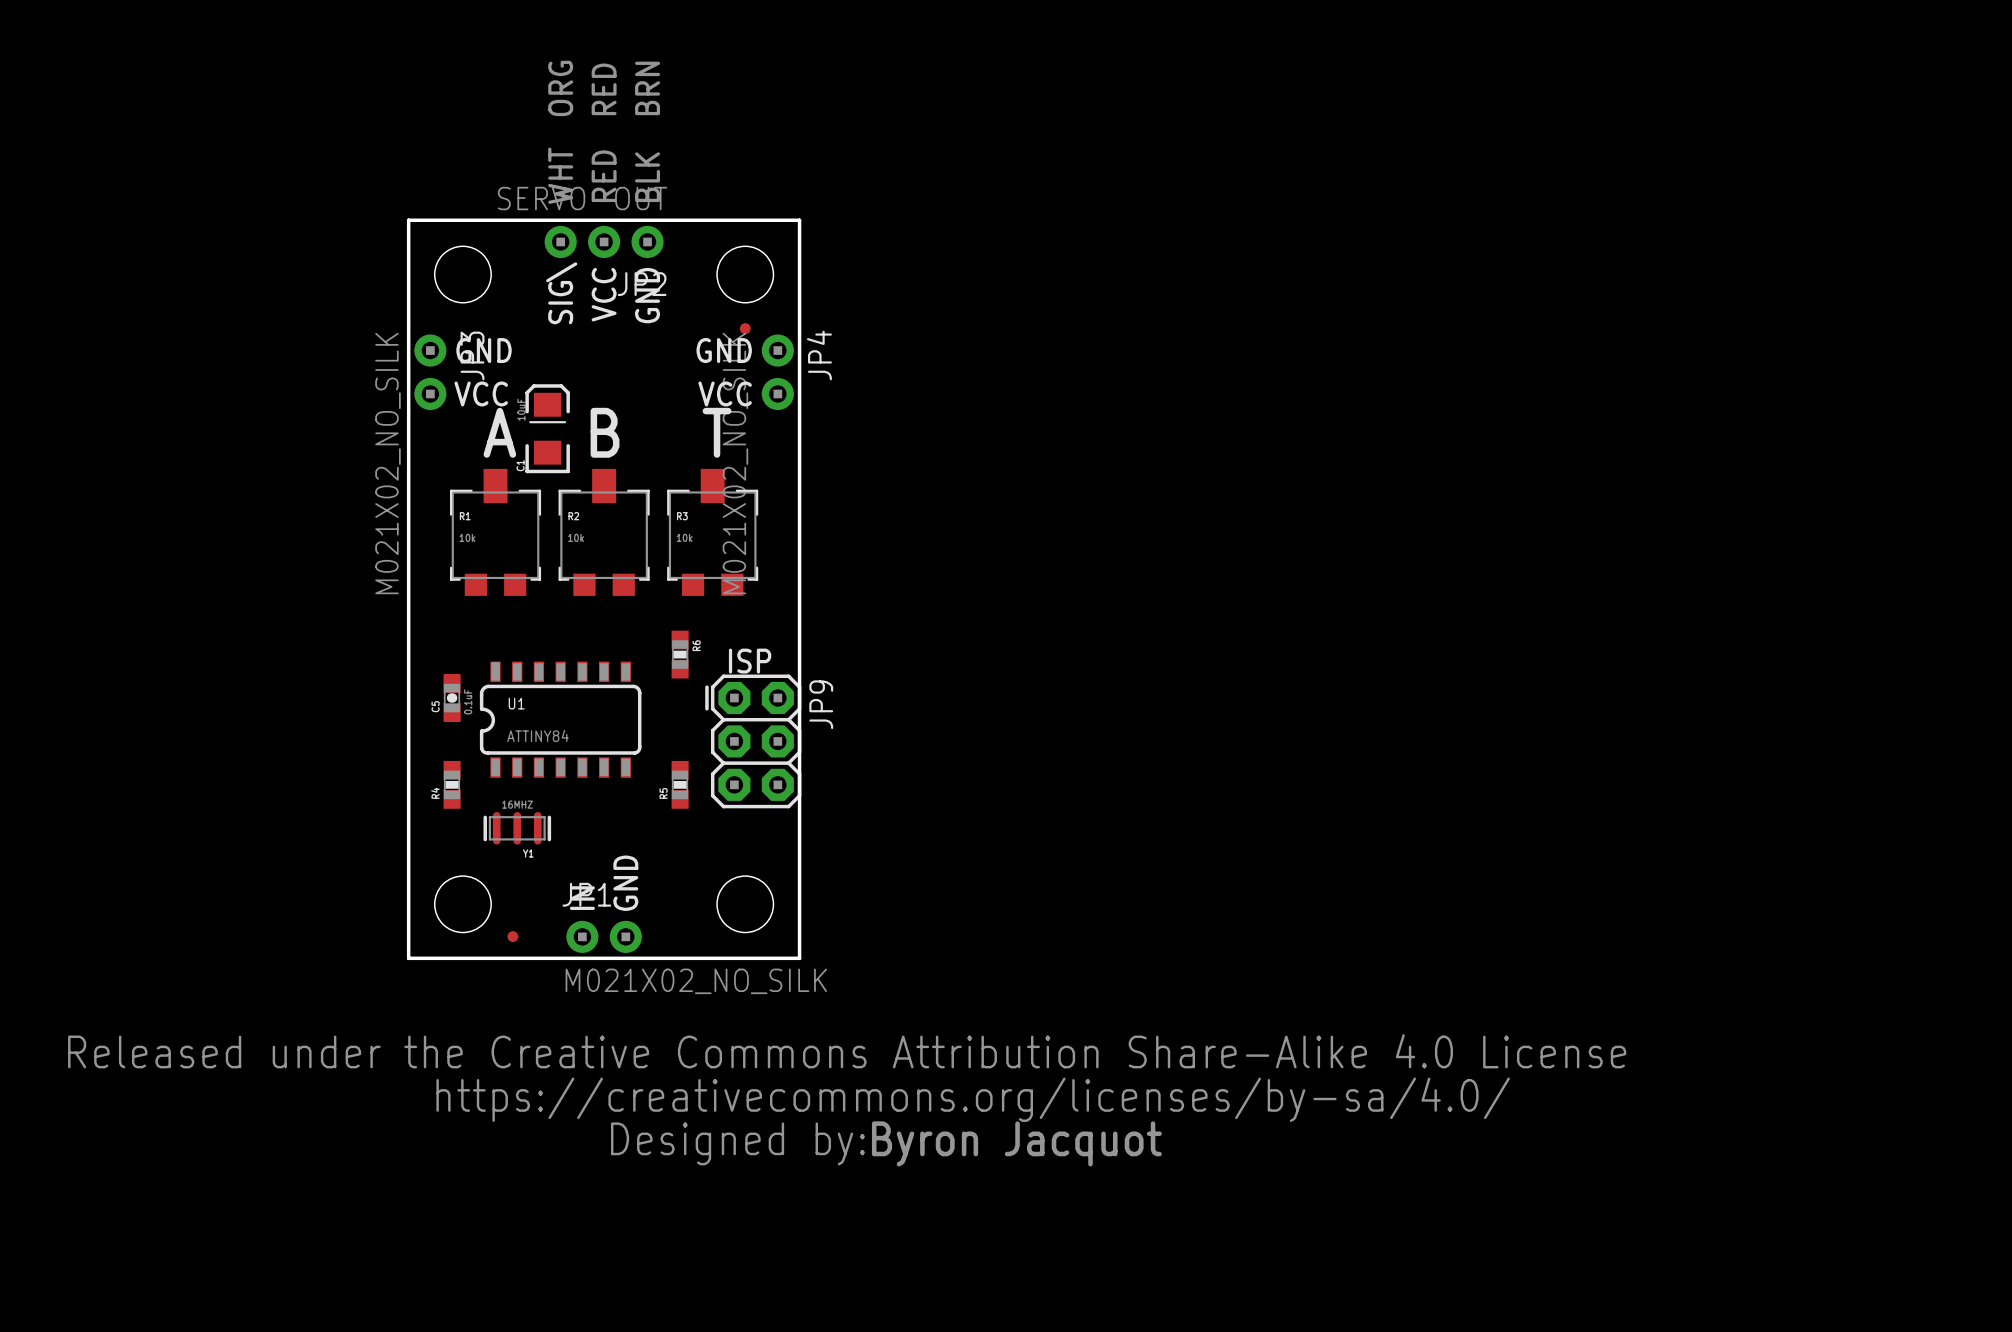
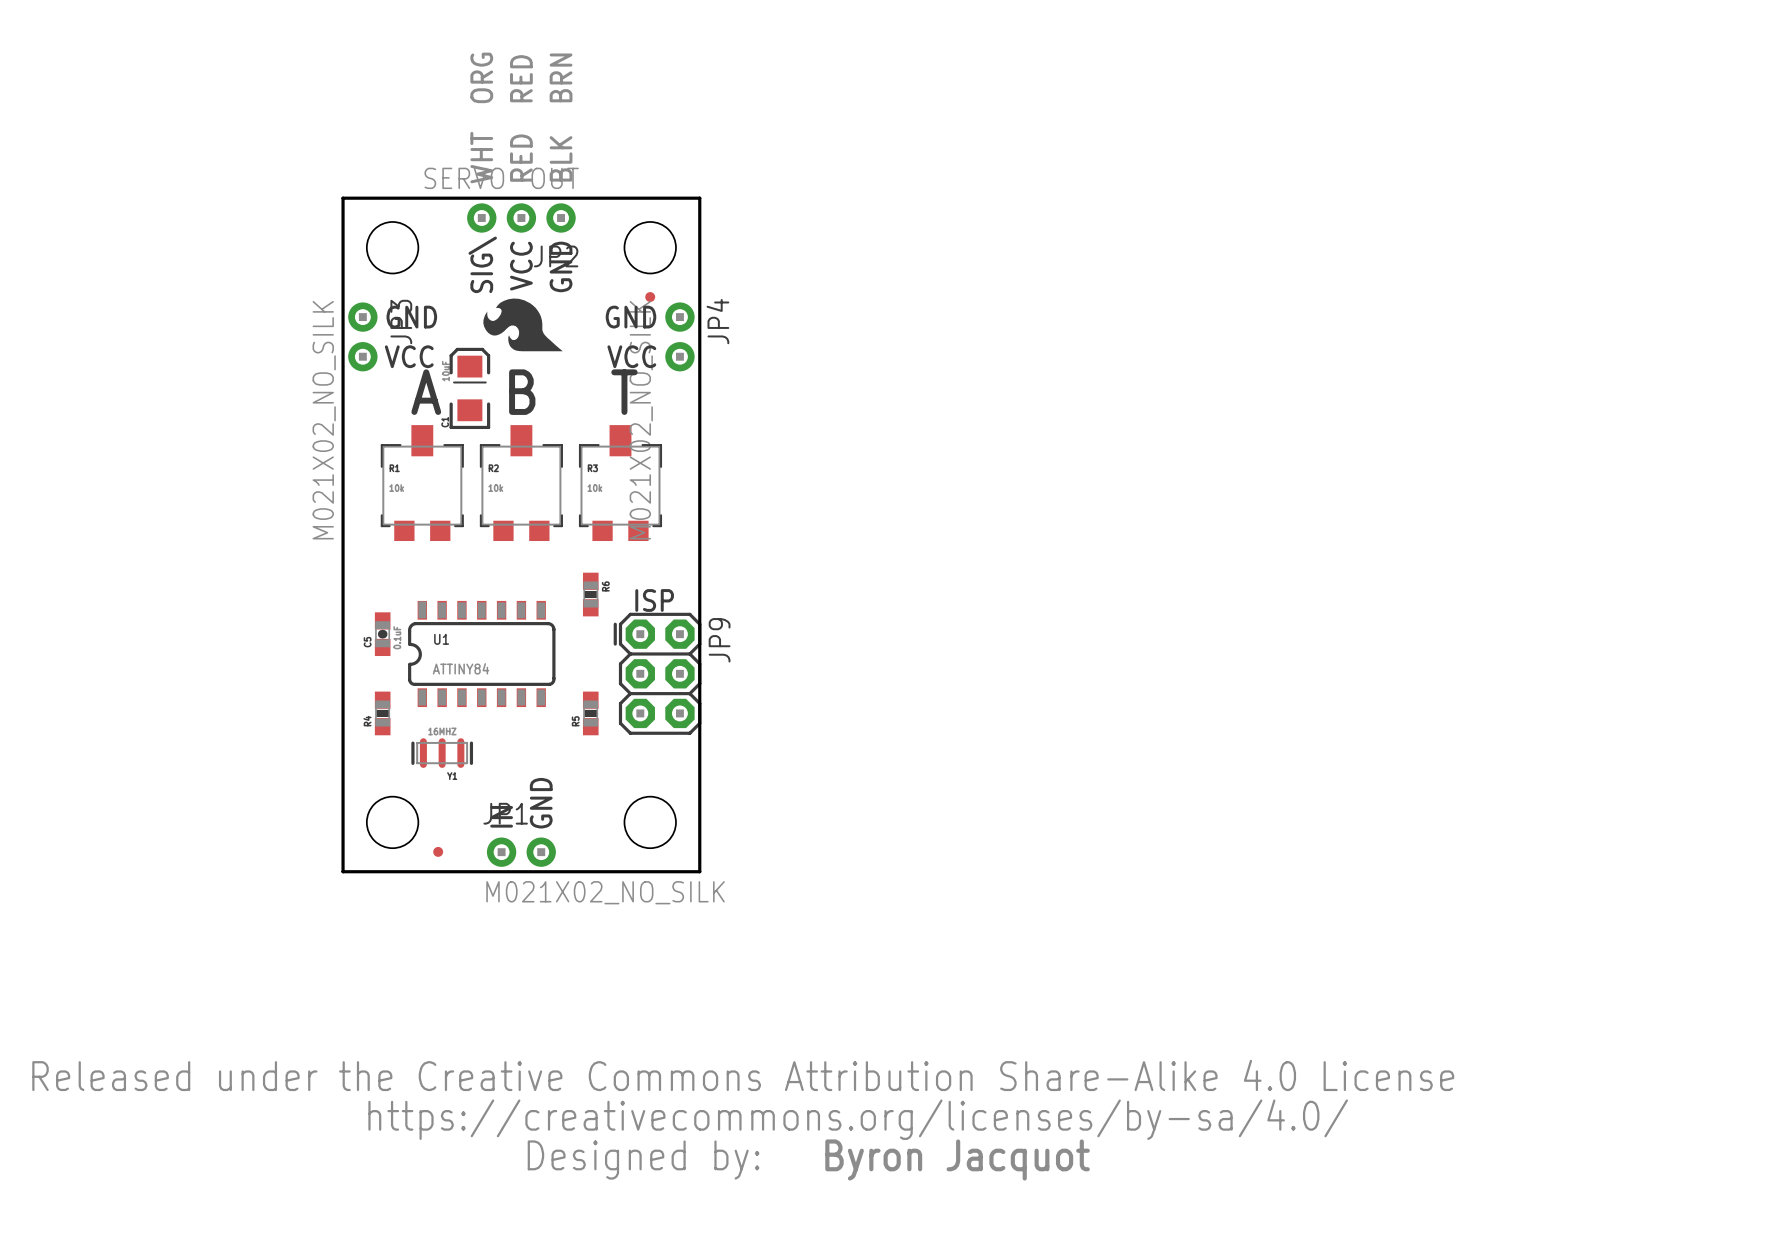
drawing: none -> [483, 298, 563, 352]
drawing position: (847, 1099) -> (743, 1119)
text position: Byron Jacquot (1016, 1143) -> Byron Jacquot (957, 1159)

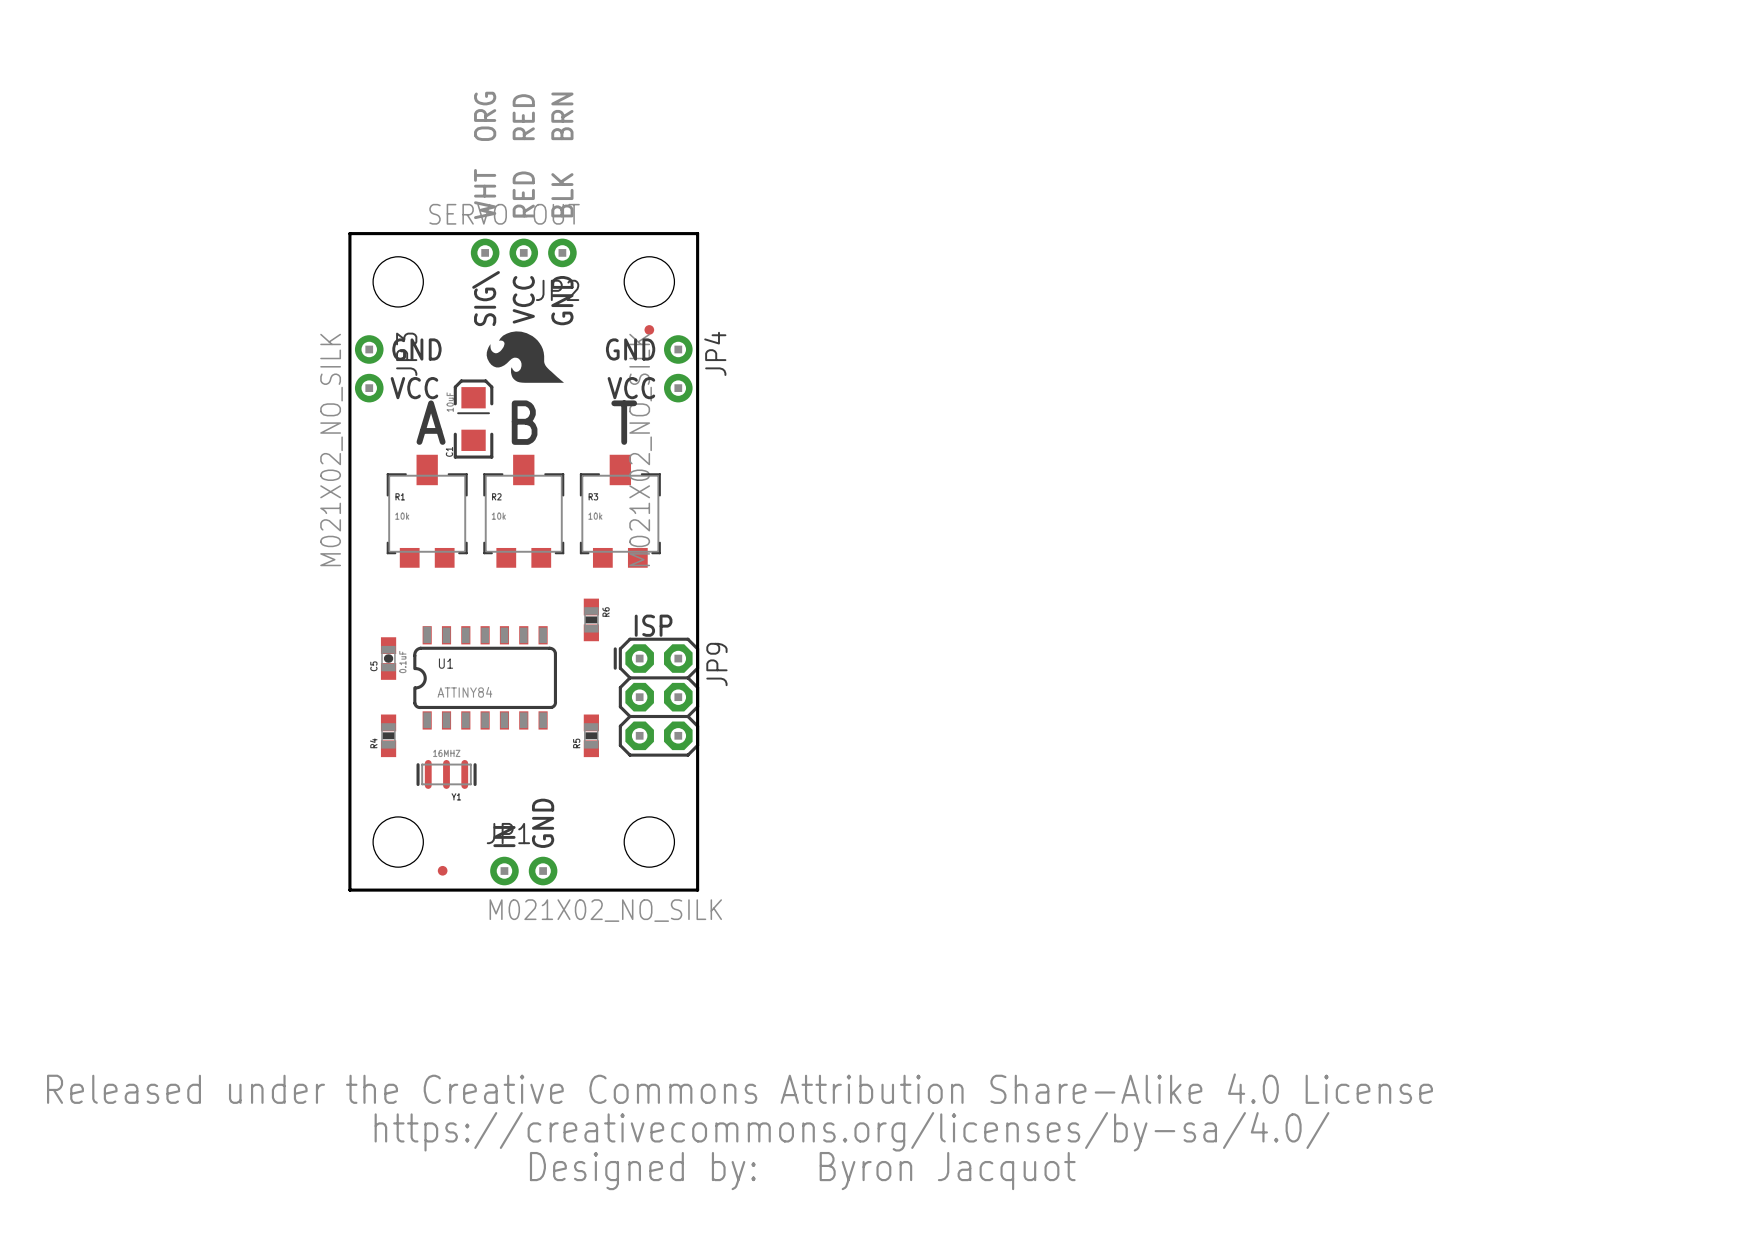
drawing shape: [32, 1059, 1455, 1180] -> [47, 1073, 1433, 1191]
text: Byron Jacquot (957, 1159) -> none

